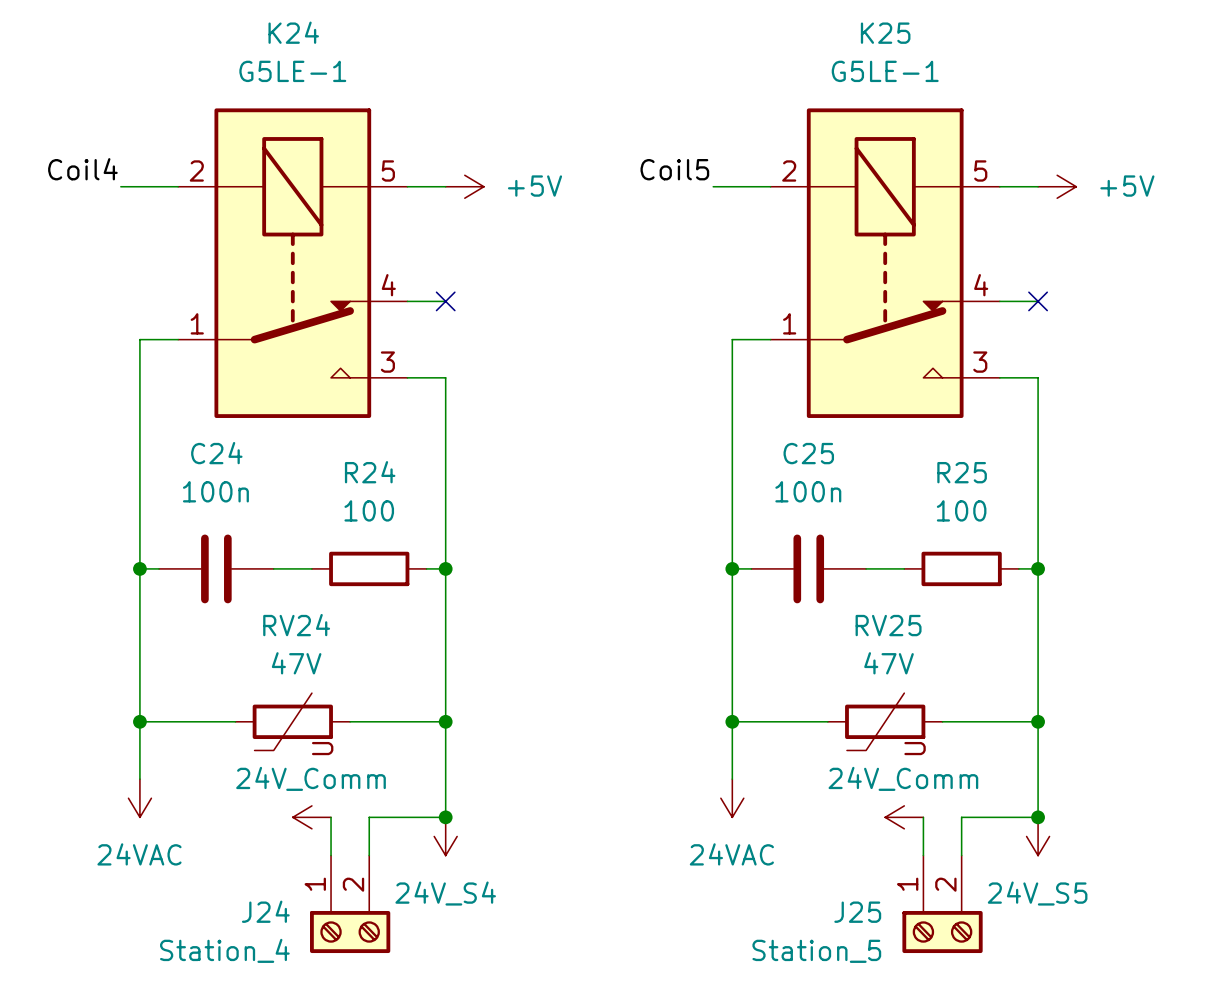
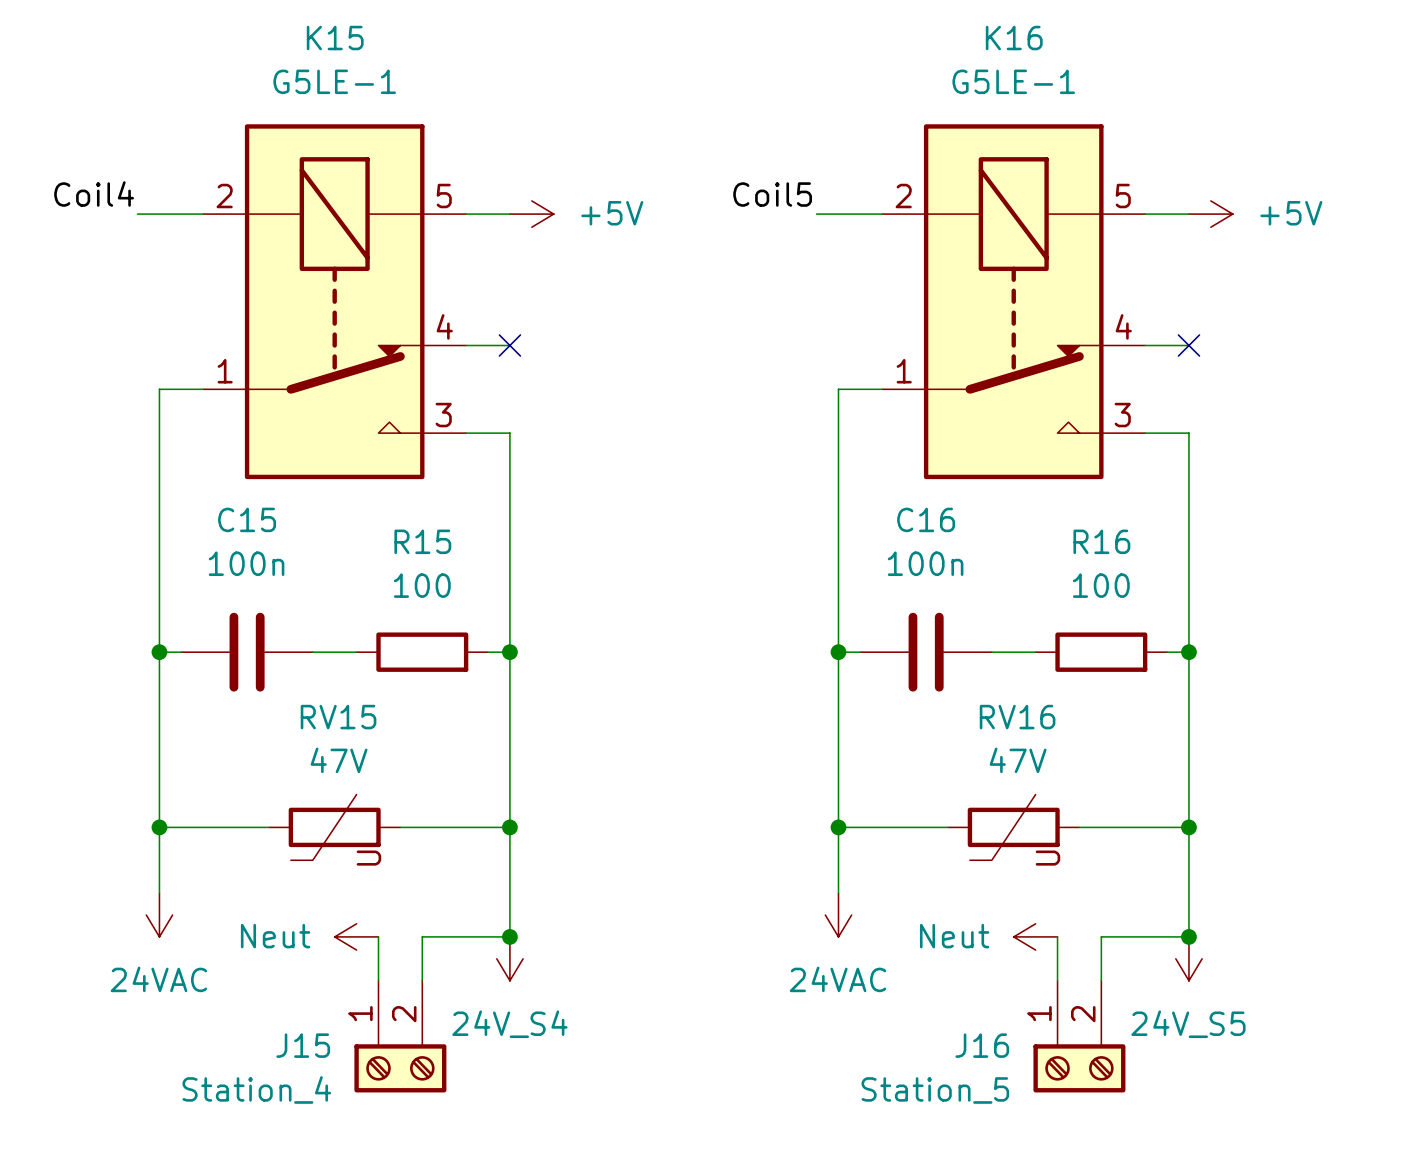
K24 name: K24 (293, 32) -> K15 (335, 38)
K25 name: K25 (885, 33) -> K16 (1014, 38)
C24 name: C24 (216, 453) -> C15 (247, 519)
C25 name: C25 (808, 453) -> C16 (926, 519)
R24 name: R24 (370, 472) -> R15 (422, 541)
R25 name: R25 (962, 472) -> R16 (1101, 541)
RV24 name: RV24 (296, 625) -> RV15 (338, 717)
RV25 name: RV25 (888, 625) -> RV16 (1017, 717)
power symbol: 24V_Comm (311, 817) -> Neut (356, 936)
power symbol: 24V_Comm (904, 817) -> Neut (1035, 936)
J24 name: J24 (265, 911) -> J15 (303, 1045)
J25 name: J25 (857, 912) -> J16 (982, 1045)

